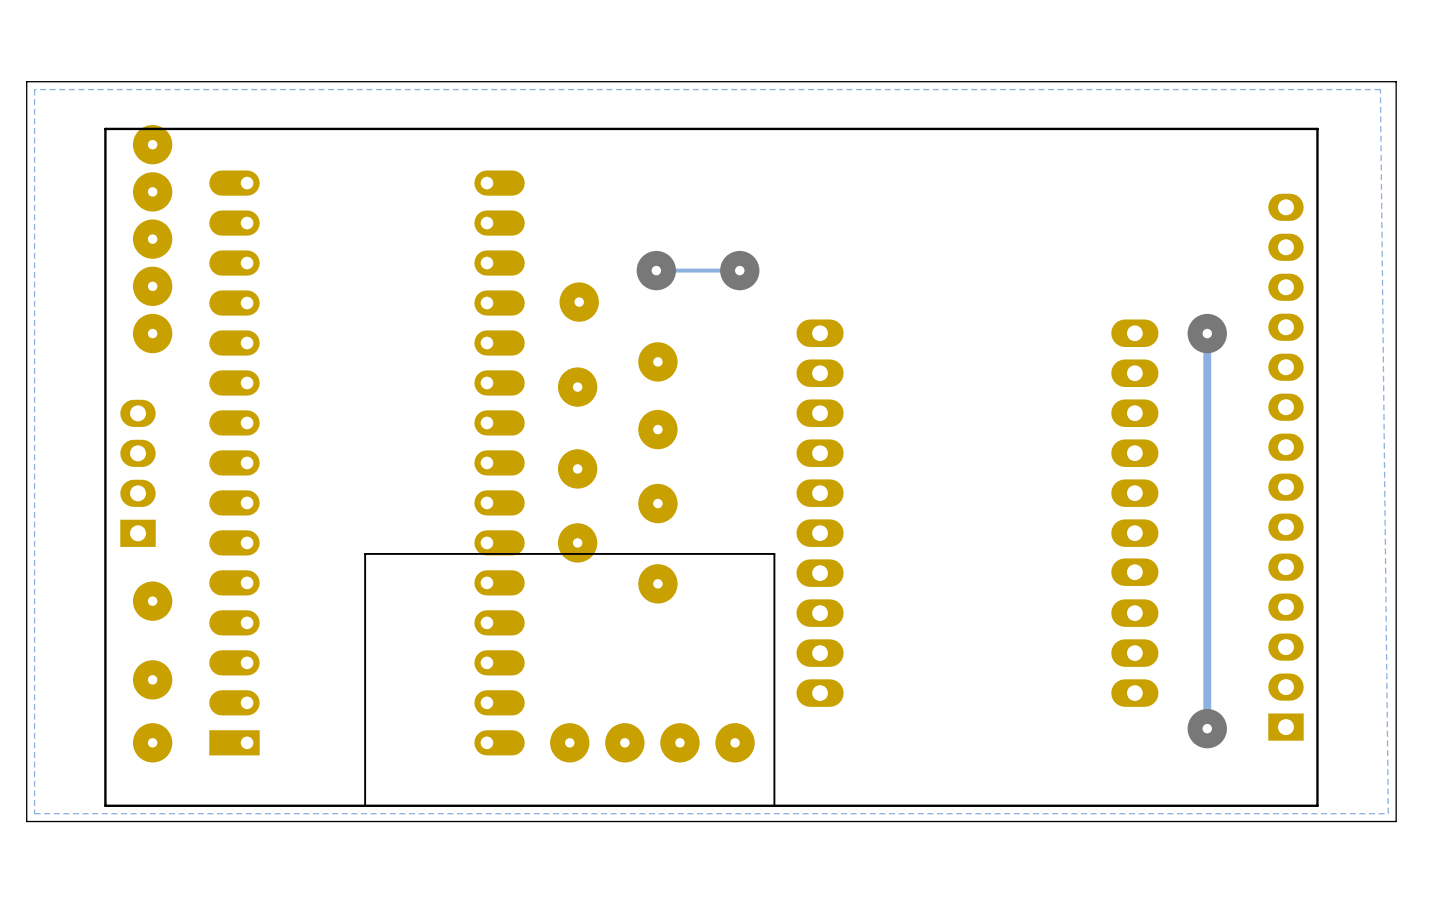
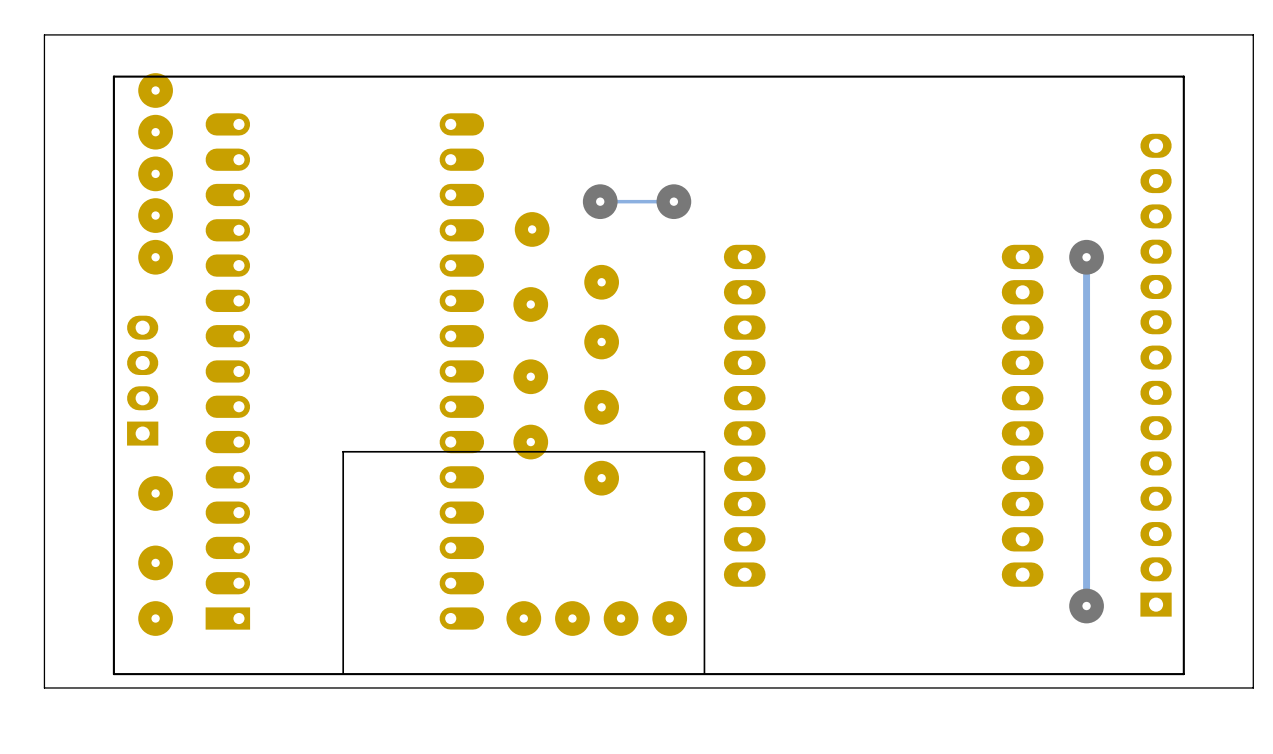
zone outline: (1380, 89) (1388, 813) (34, 813) (34, 89) (1380, 89) -> none

